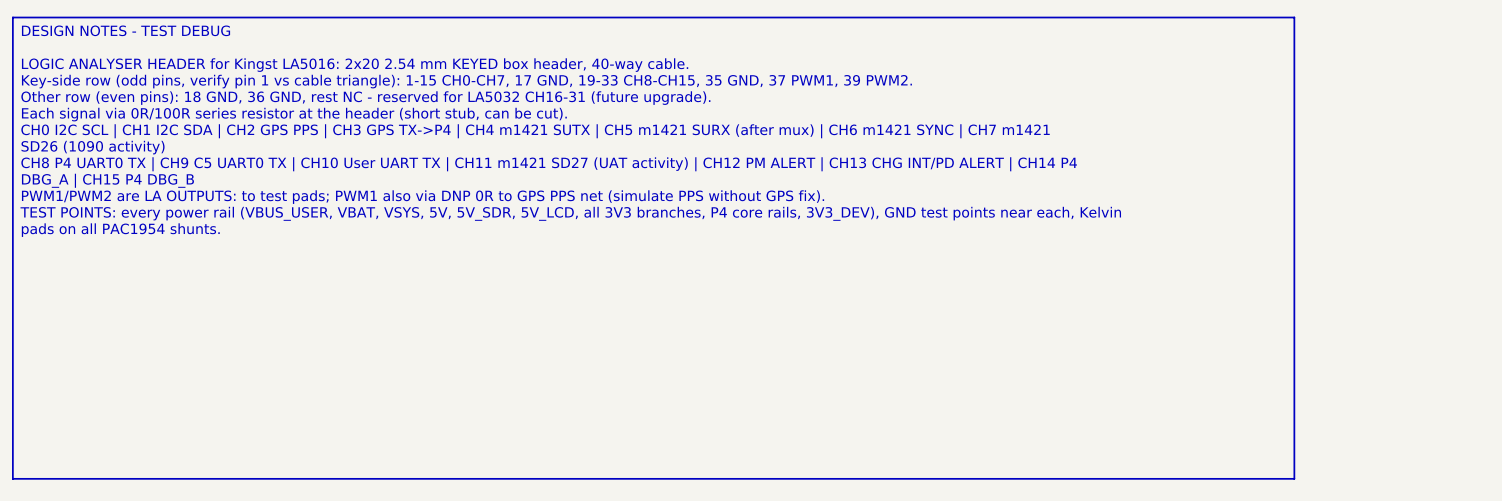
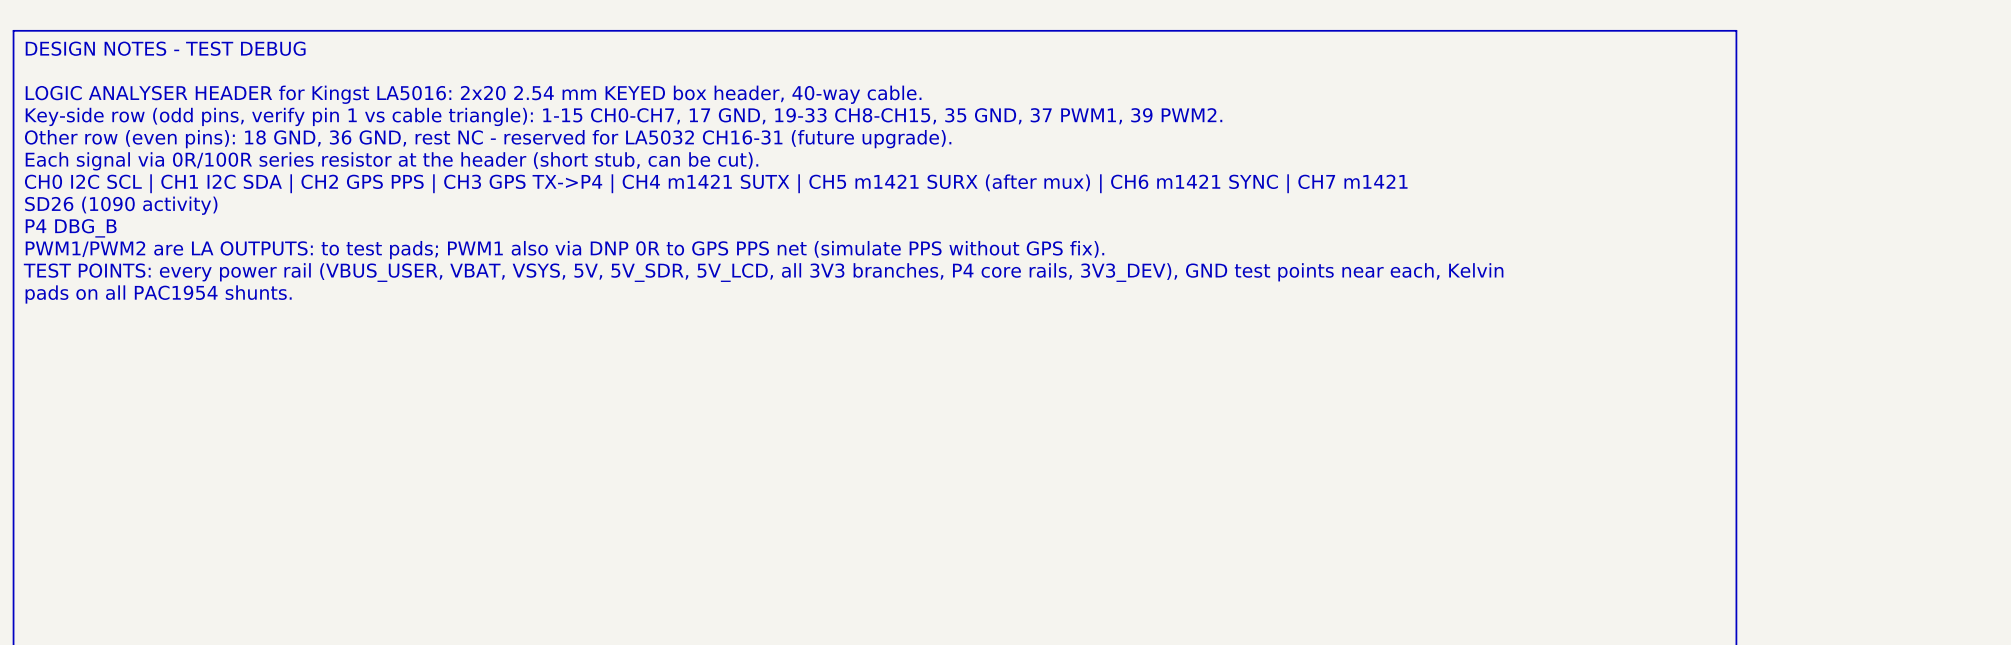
text: CH8 P4 UART0 TX | CH9 C5 UART0 TX | CH10 User UART TX | CH11 m1421 SD27 (UAT activity) | CH12 PM ALERT | CH13 CHG INT/PD ALERT | CH14 P4 (549, 164) -> P4 DBG_B (71, 228)
text: DBG_A | CH15 P4 DBG_B (107, 180) -> PWM1/PWM2 are LA OUTPUTS: to test pads; PWM1 also via DNP 0R to GPS PPS net (simulate PPS without GPS fix). (564, 250)
text: PWM1/PWM2 are LA OUTPUTS: to test pads; PWM1 also via DNP 0R to GPS PPS net (simulate PPS without GPS fix). (423, 197) -> TEST POINTS: every power rail (VBUS_USER, VBAT, VSYS, 5V, 5V_SDR, 5V_LCD, all 3V3 branches, P4 core rails, 3V3_DEV), GND test points near each, Kelvin (763, 272)
text: TEST POINTS: every power rail (VBUS_USER, VBAT, VSYS, 5V, 5V_SDR, 5V_LCD, all 3V3 branches, P4 core rails, 3V3_DEV), GND test points near each, Kelvin (570, 213) -> pads on all PAC1954 shunts. (158, 294)
text: pads on all PAC1954 shunts. (120, 230) -> none

